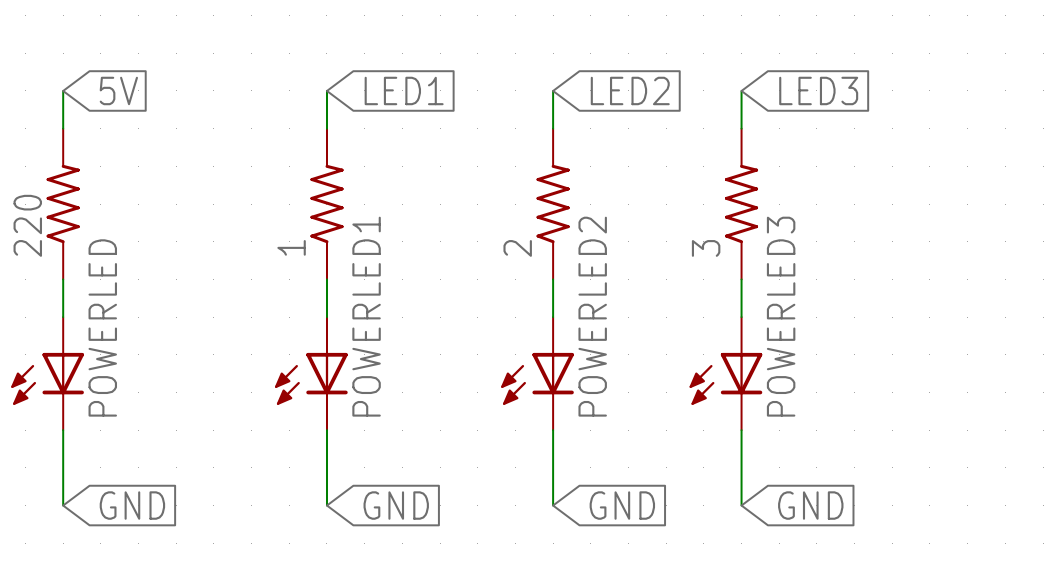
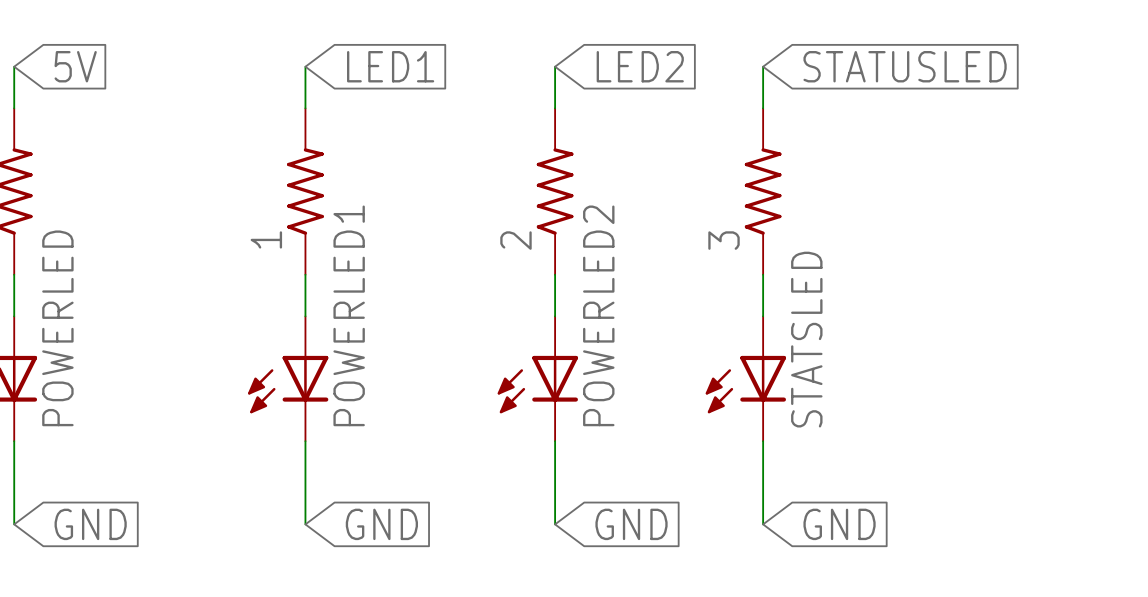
global label: LED3 (818, 90) -> STATUSLED (905, 66)
POWERLED3 name: POWERLED3 (781, 316) -> STATSLED (806, 339)

